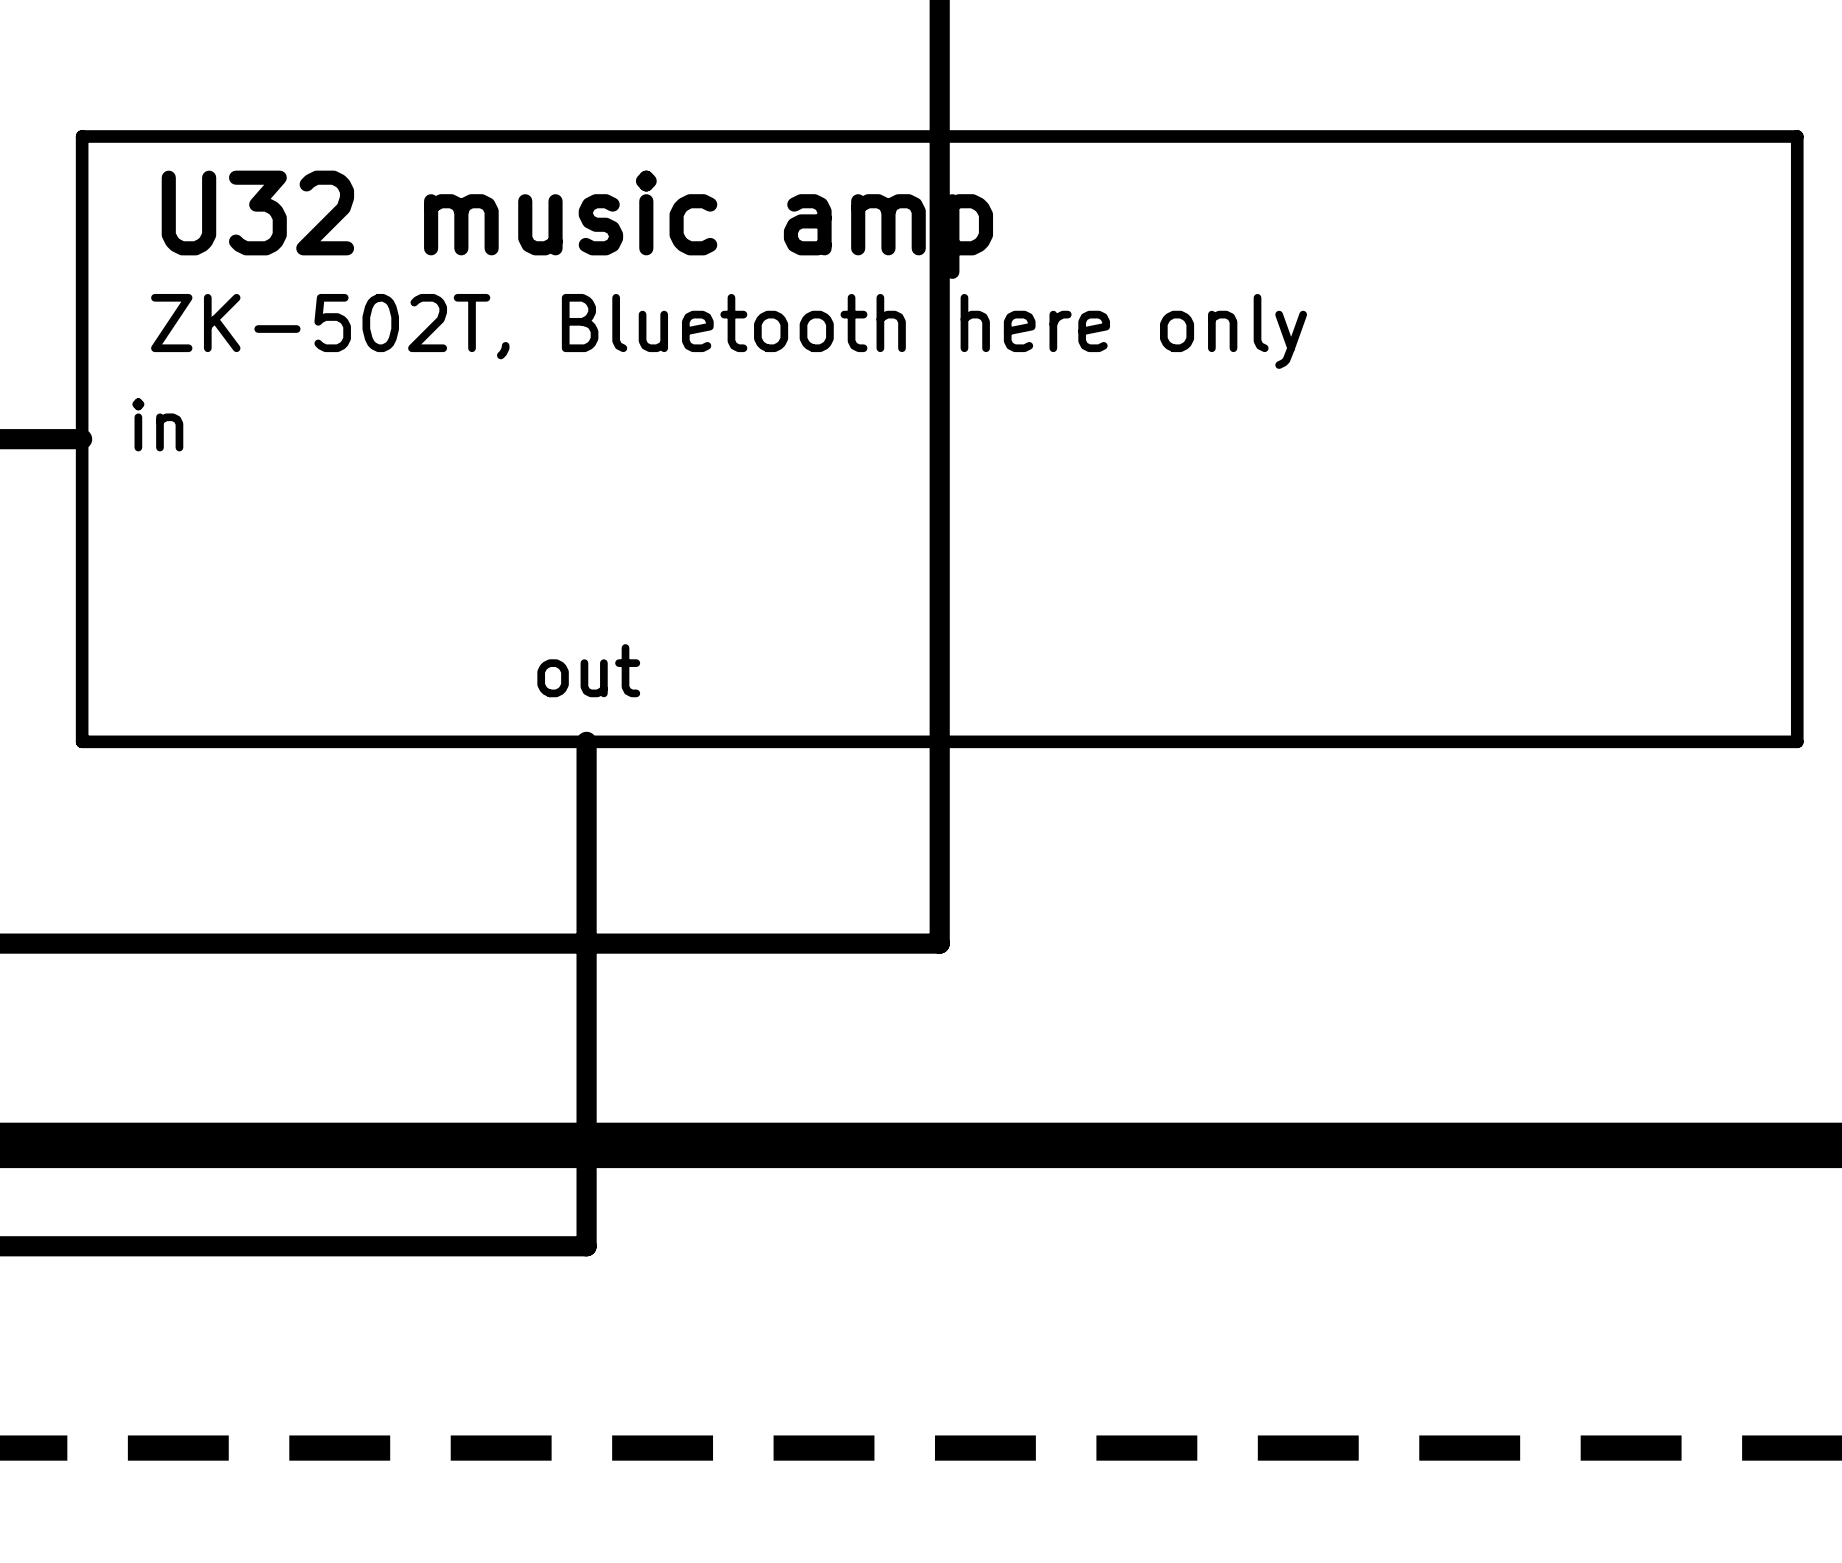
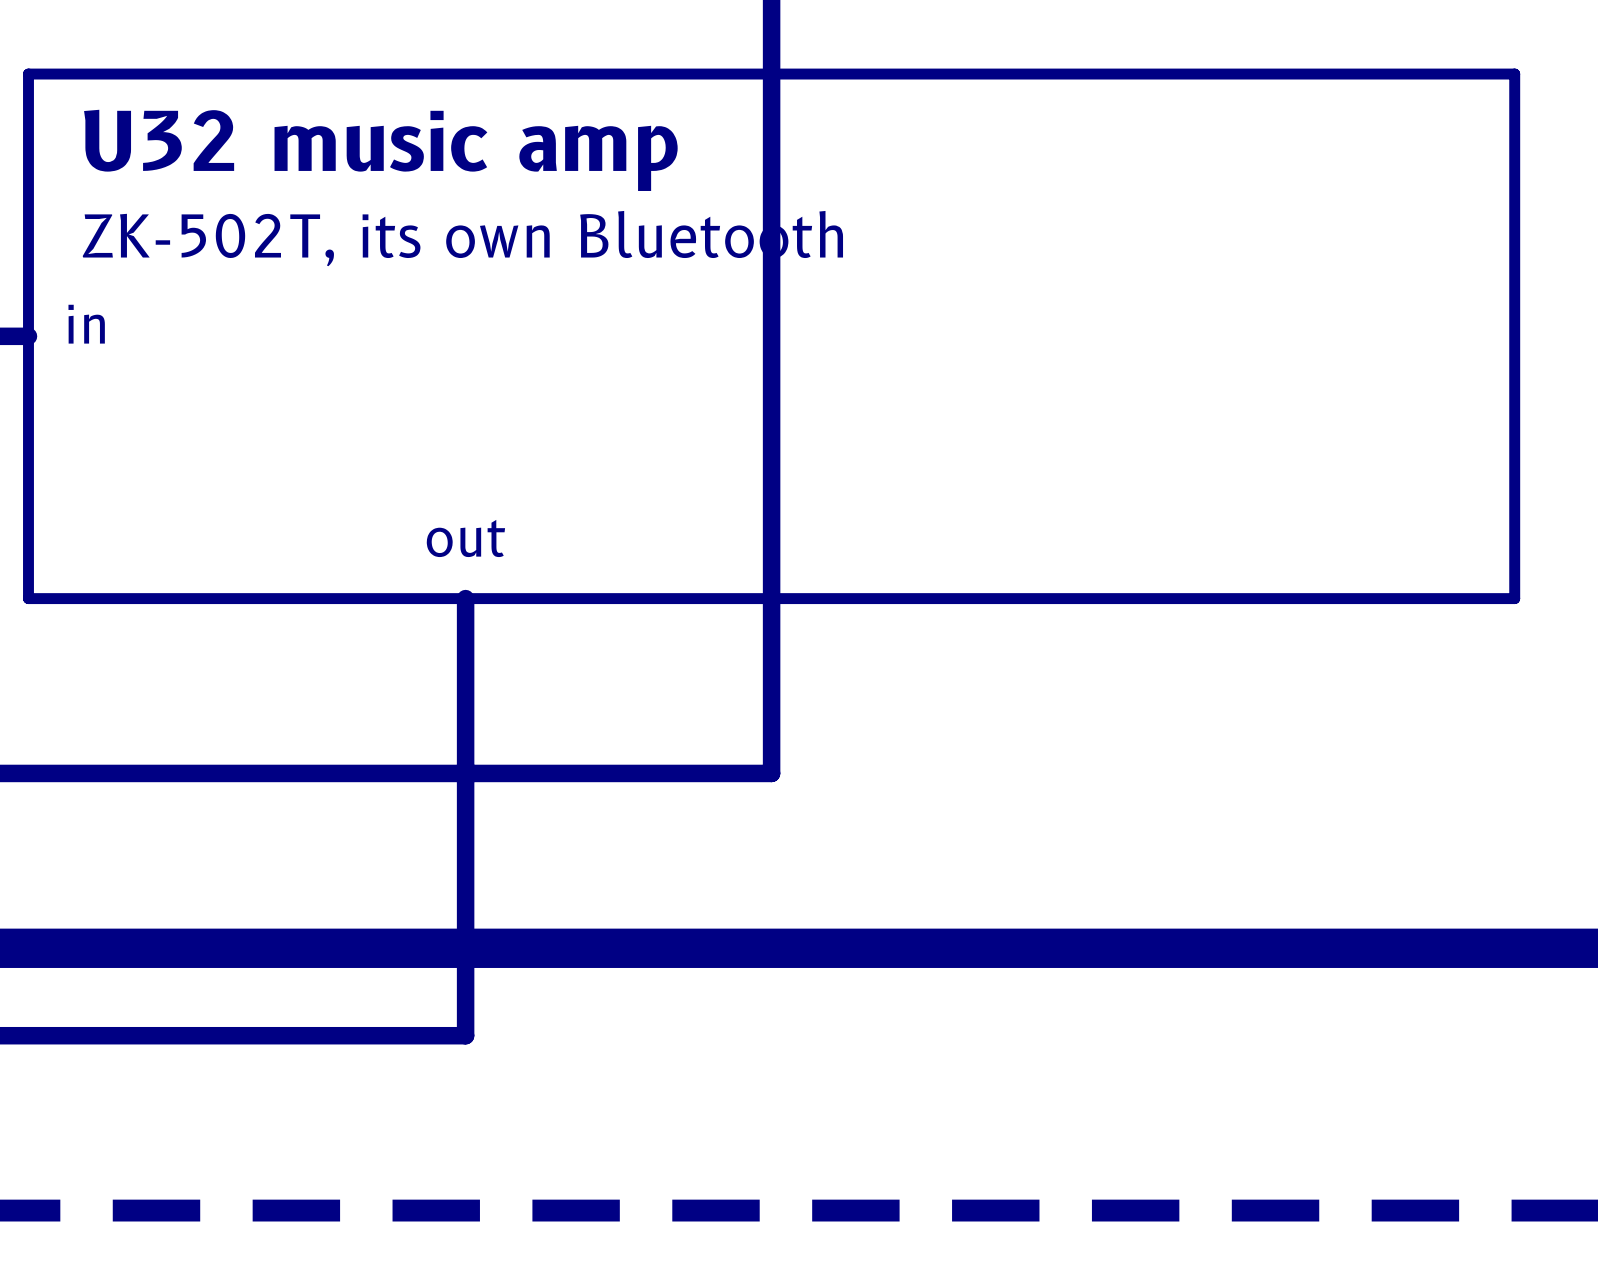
text: ZK-502T, Bluetooth here only (729, 331) -> ZK-502T, its own Bluetooth (462, 238)

